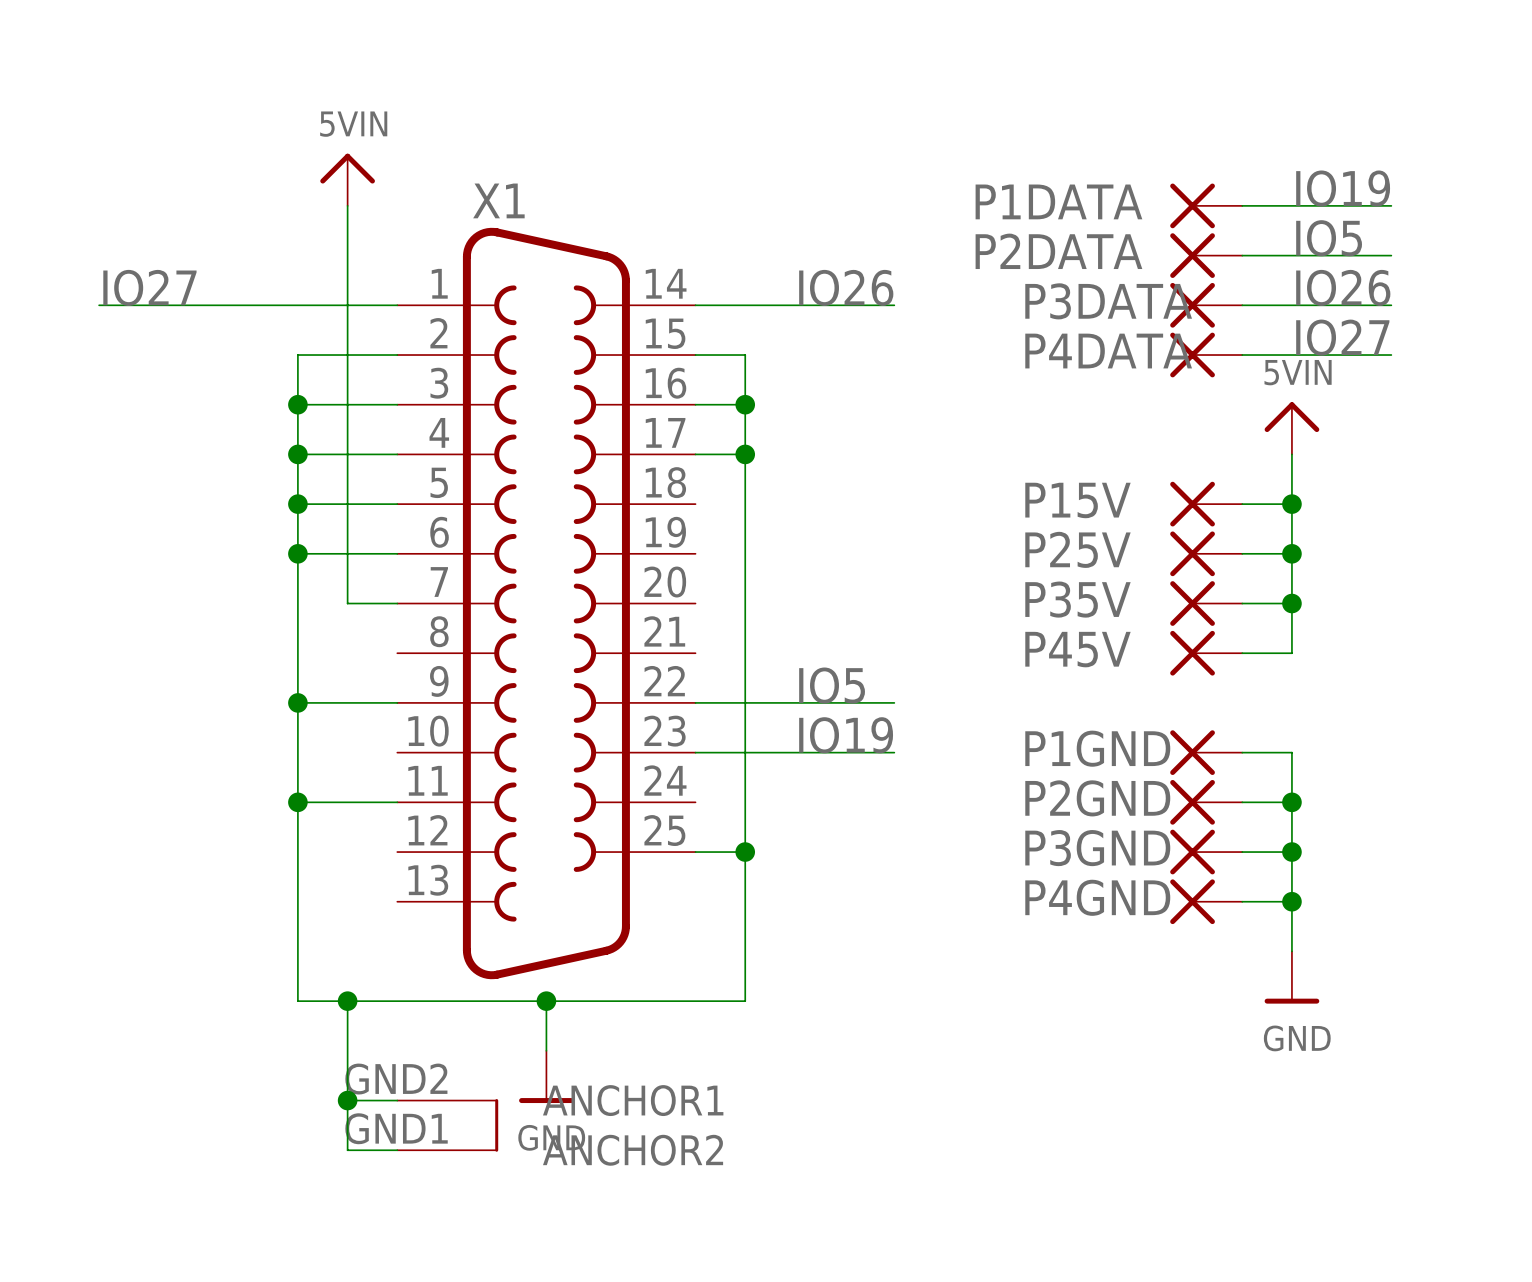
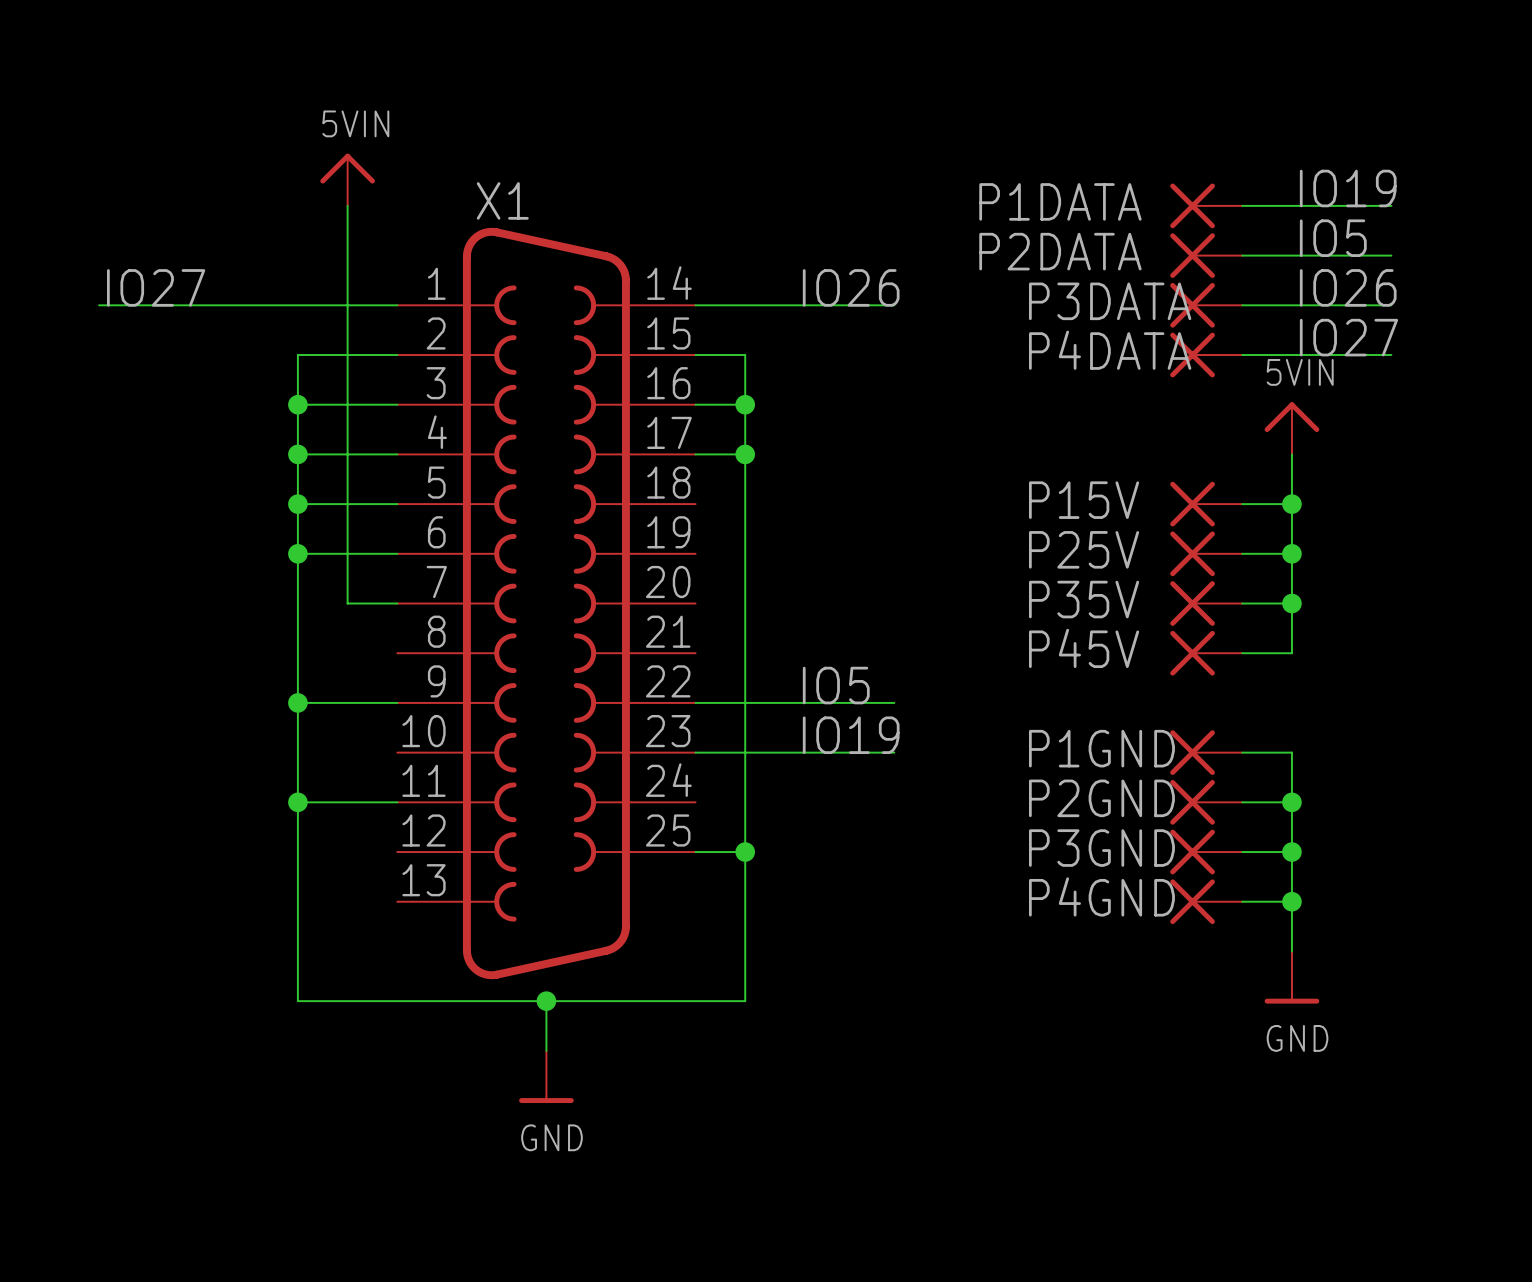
X1 symbol: [397, 227, 696, 1152] -> [397, 227, 696, 980]
wire: (347, 1001) (347, 1150) (397, 1150) -> none
junction: (347, 1001) -> none
wire: (347, 1100) (397, 1100) -> none
junction: (347, 1100) -> none

